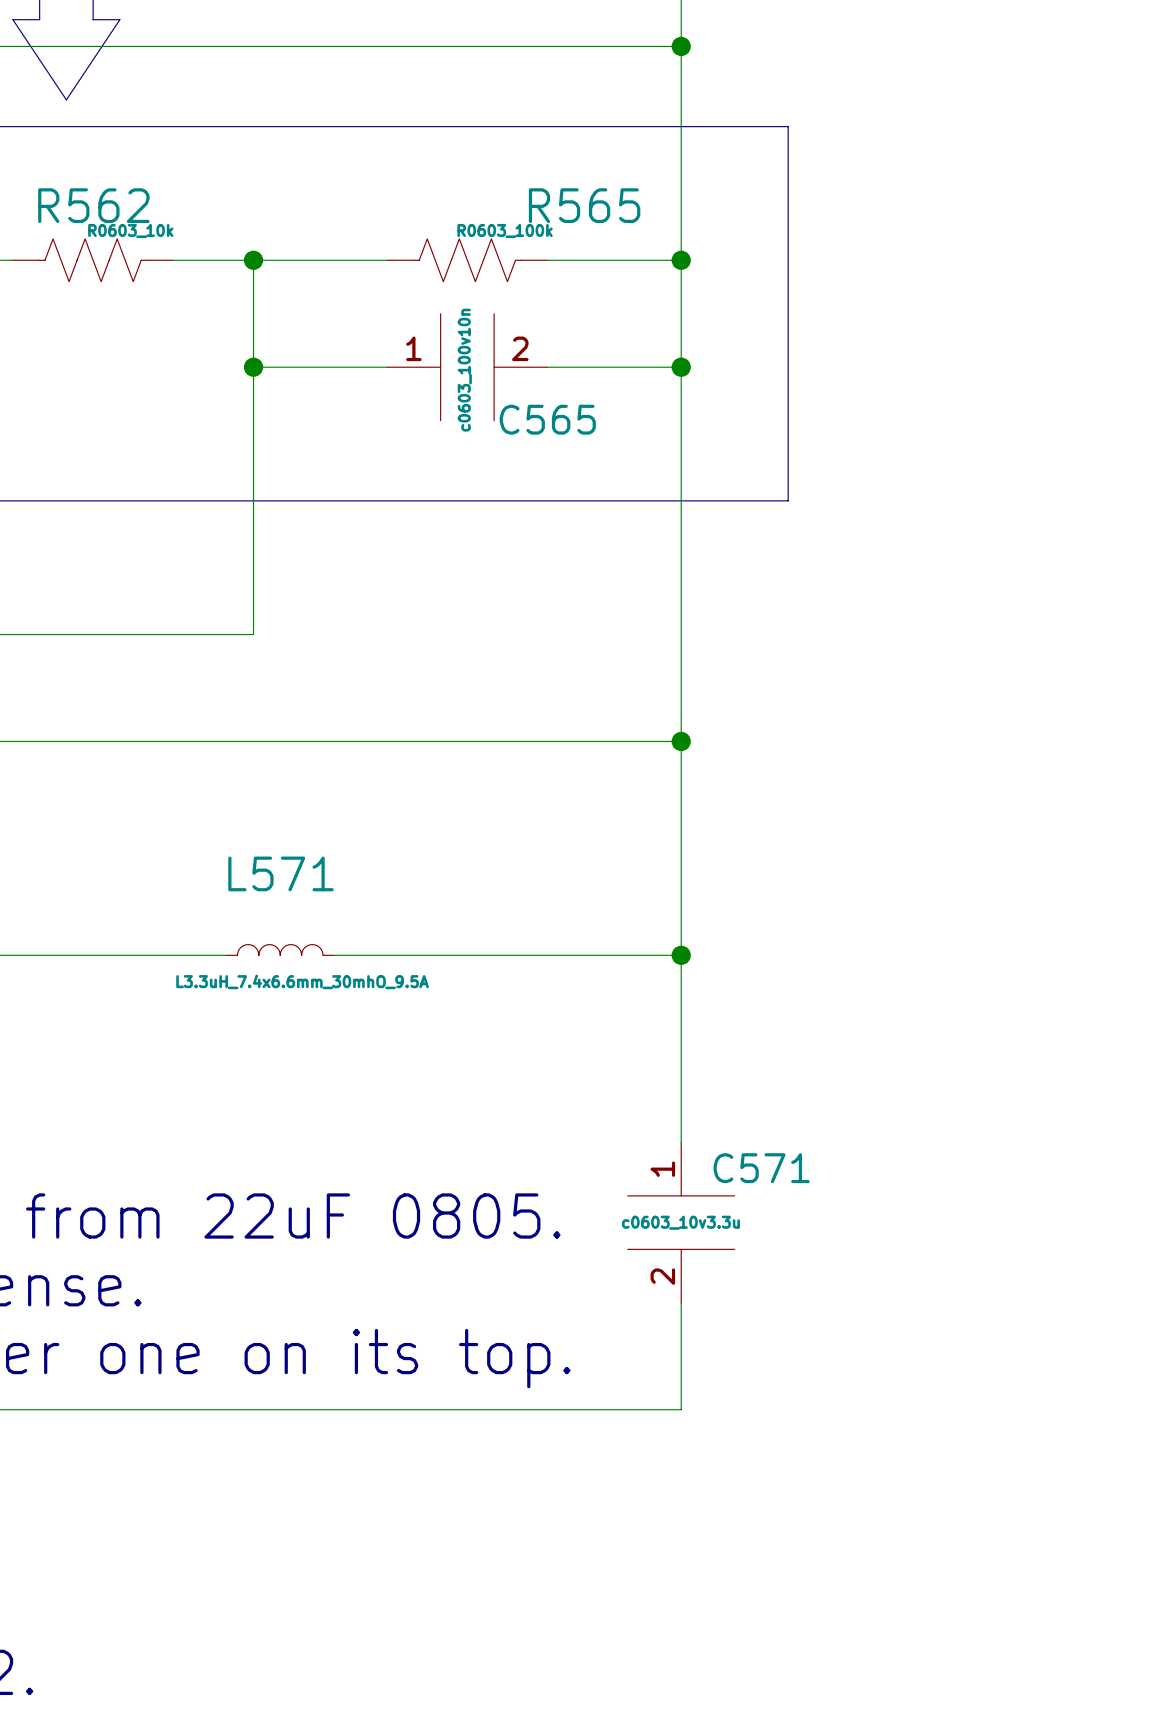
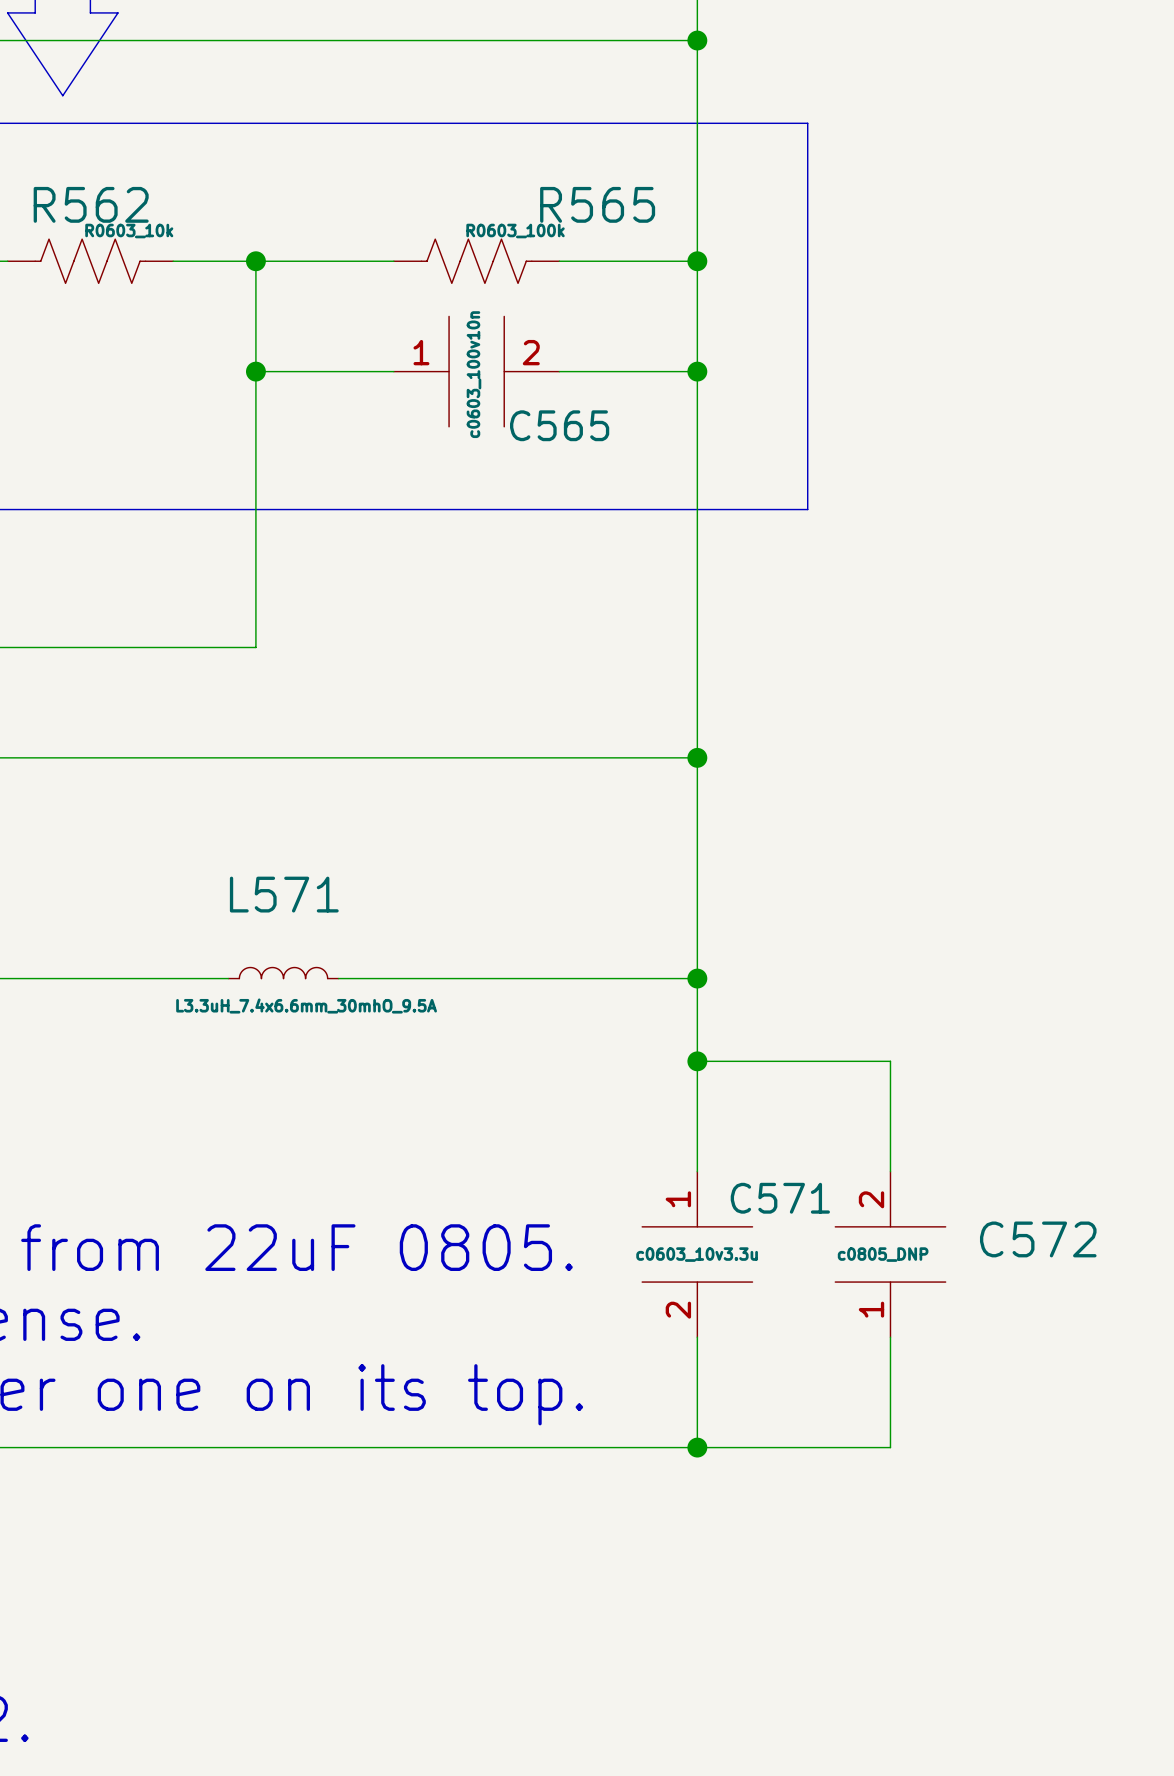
wire: none -> (697, 1061) (890, 1061) (890, 1171)
junction: none -> (697, 1061)
C572: none -> c0805_DNP (890, 1254)
wire: none -> (890, 1337) (890, 1447) (697, 1447)
junction: none -> (697, 1447)

